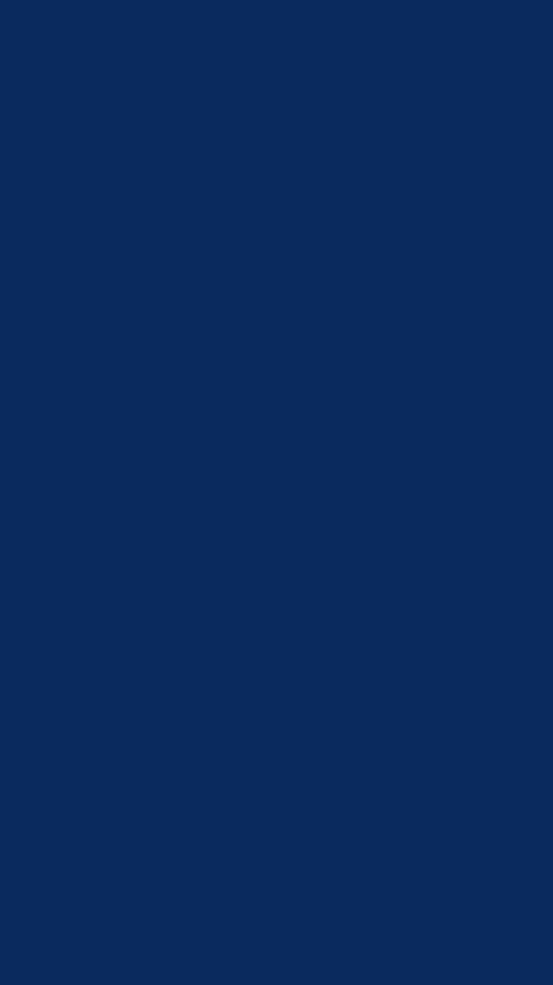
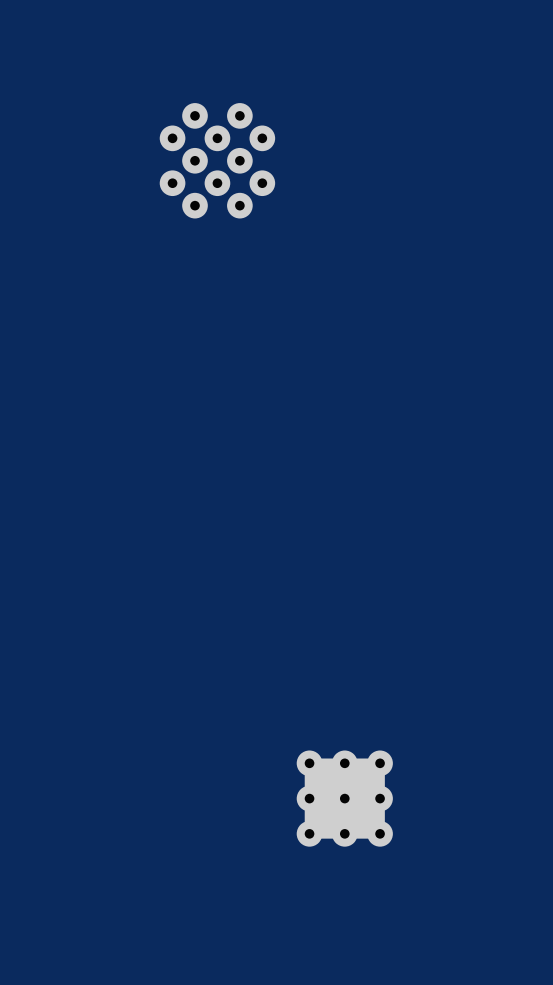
part: none -> (217, 160)
part: none -> (344, 798)

